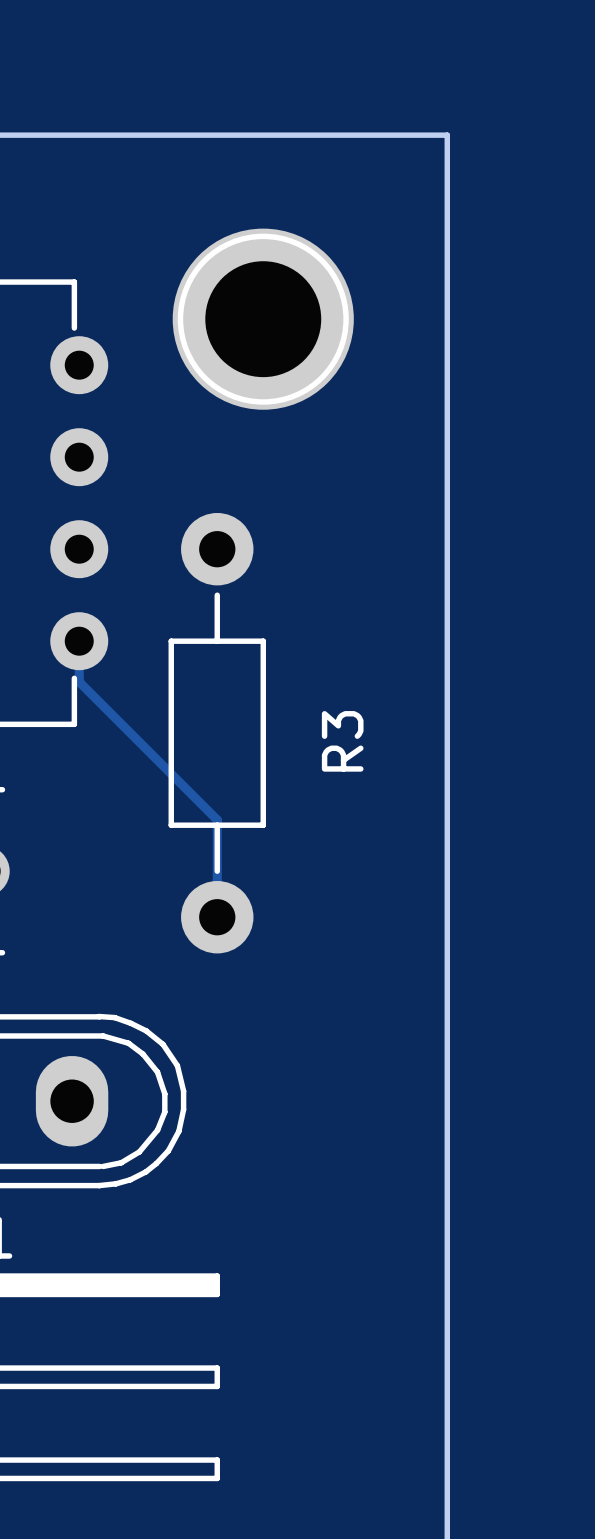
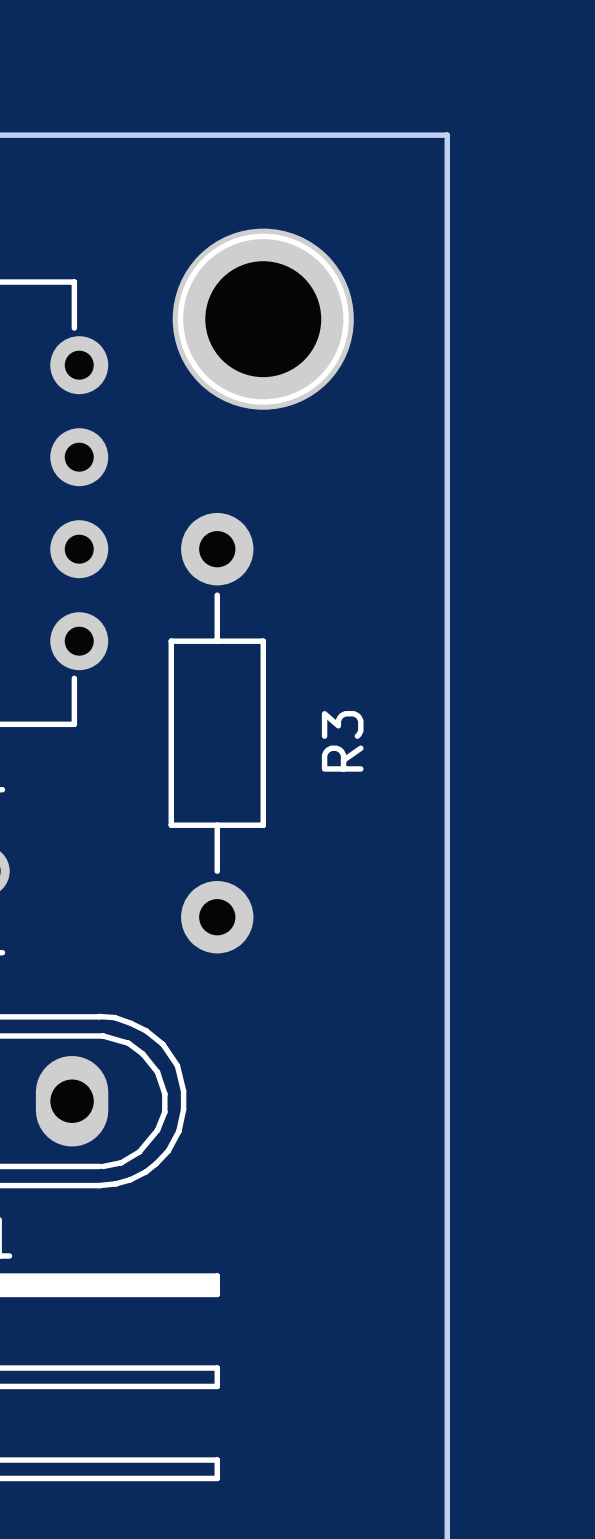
track: (79, 641) (79, 681) (217, 819) (217, 917) -> none

